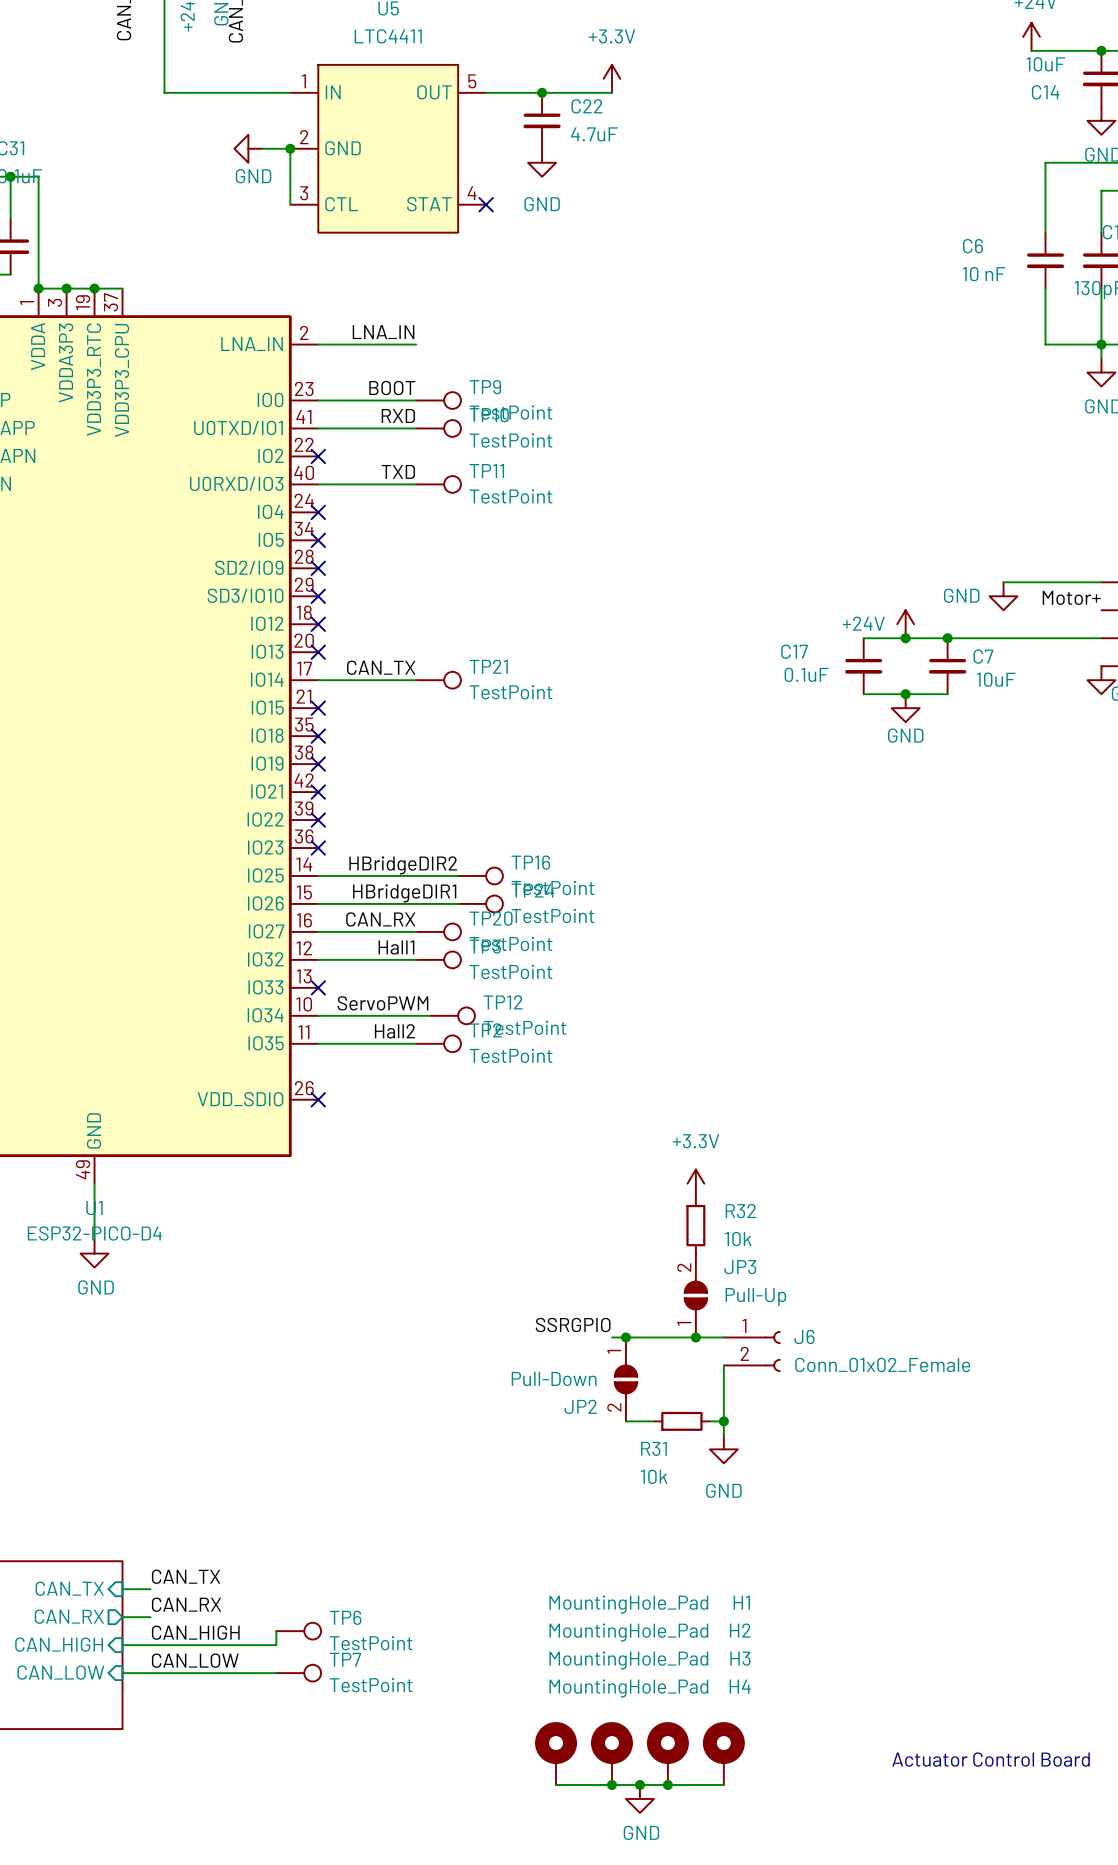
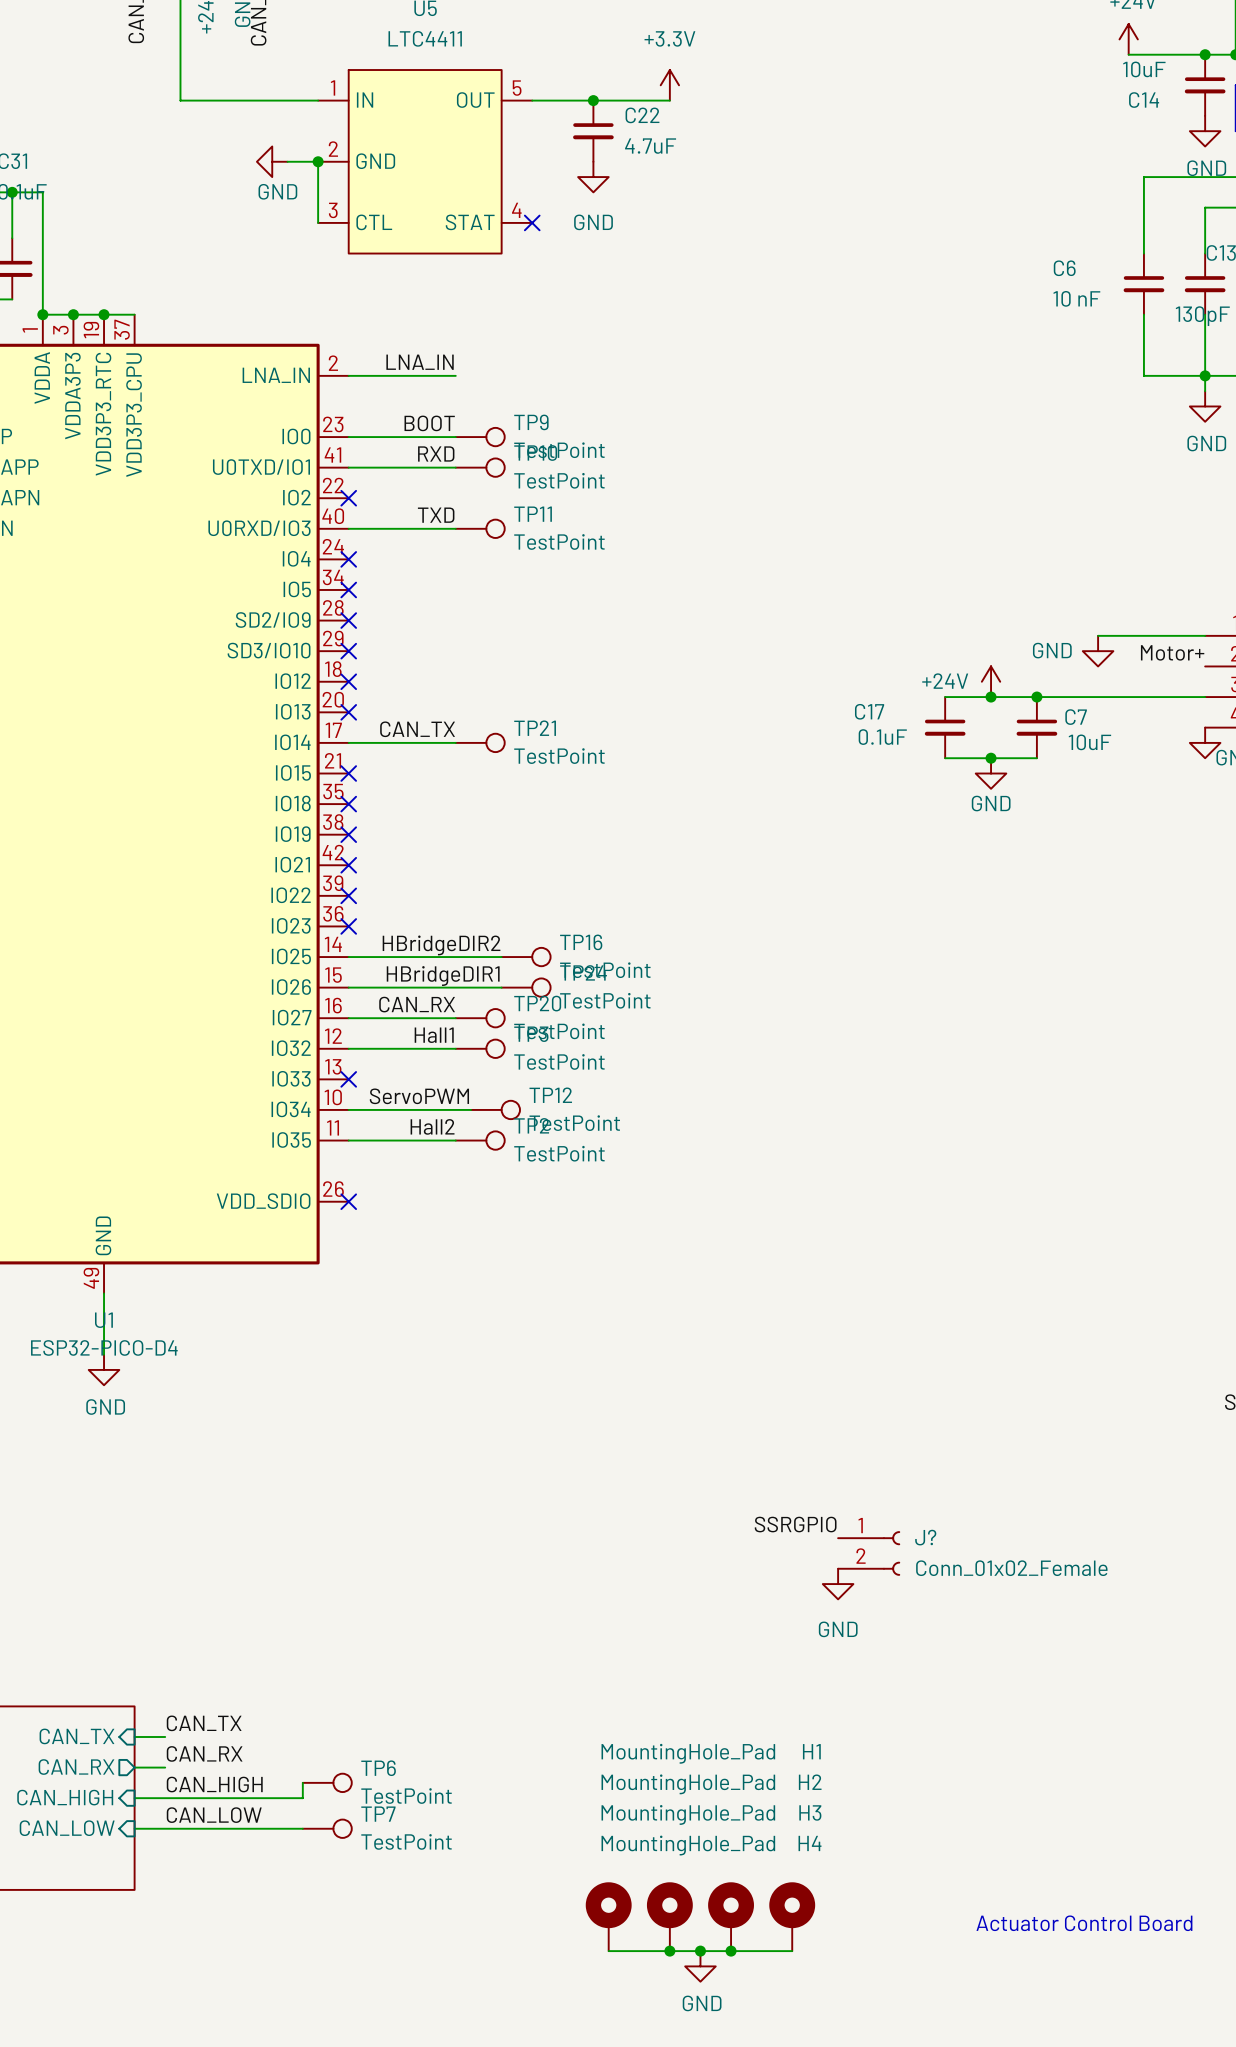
power symbol: +3.3V (695, 1183) -> none
R32: 10k (695, 1225) -> none
JP3: Pull-Up (695, 1295) -> none
label position: SSRGPIO (573, 1325) -> SSRGPIO (795, 1524)
wire: (611, 1337) (723, 1337) -> none
junction: (625, 1337) -> none
junction: (695, 1337) -> none
J6: Conn_01x02_Female (752, 1351) -> none
wire: (723, 1365) (723, 1435) -> none
JP2: Pull-Down (625, 1379) -> none
wire: (625, 1421) (653, 1421) -> none
R31: 10k (681, 1421) -> none
wire: (709, 1421) (723, 1421) -> none
junction: (723, 1421) -> none
J?: none -> Conn_01x02_Female (869, 1553)
power symbol position: GND (723, 1449) -> GND (838, 1584)

